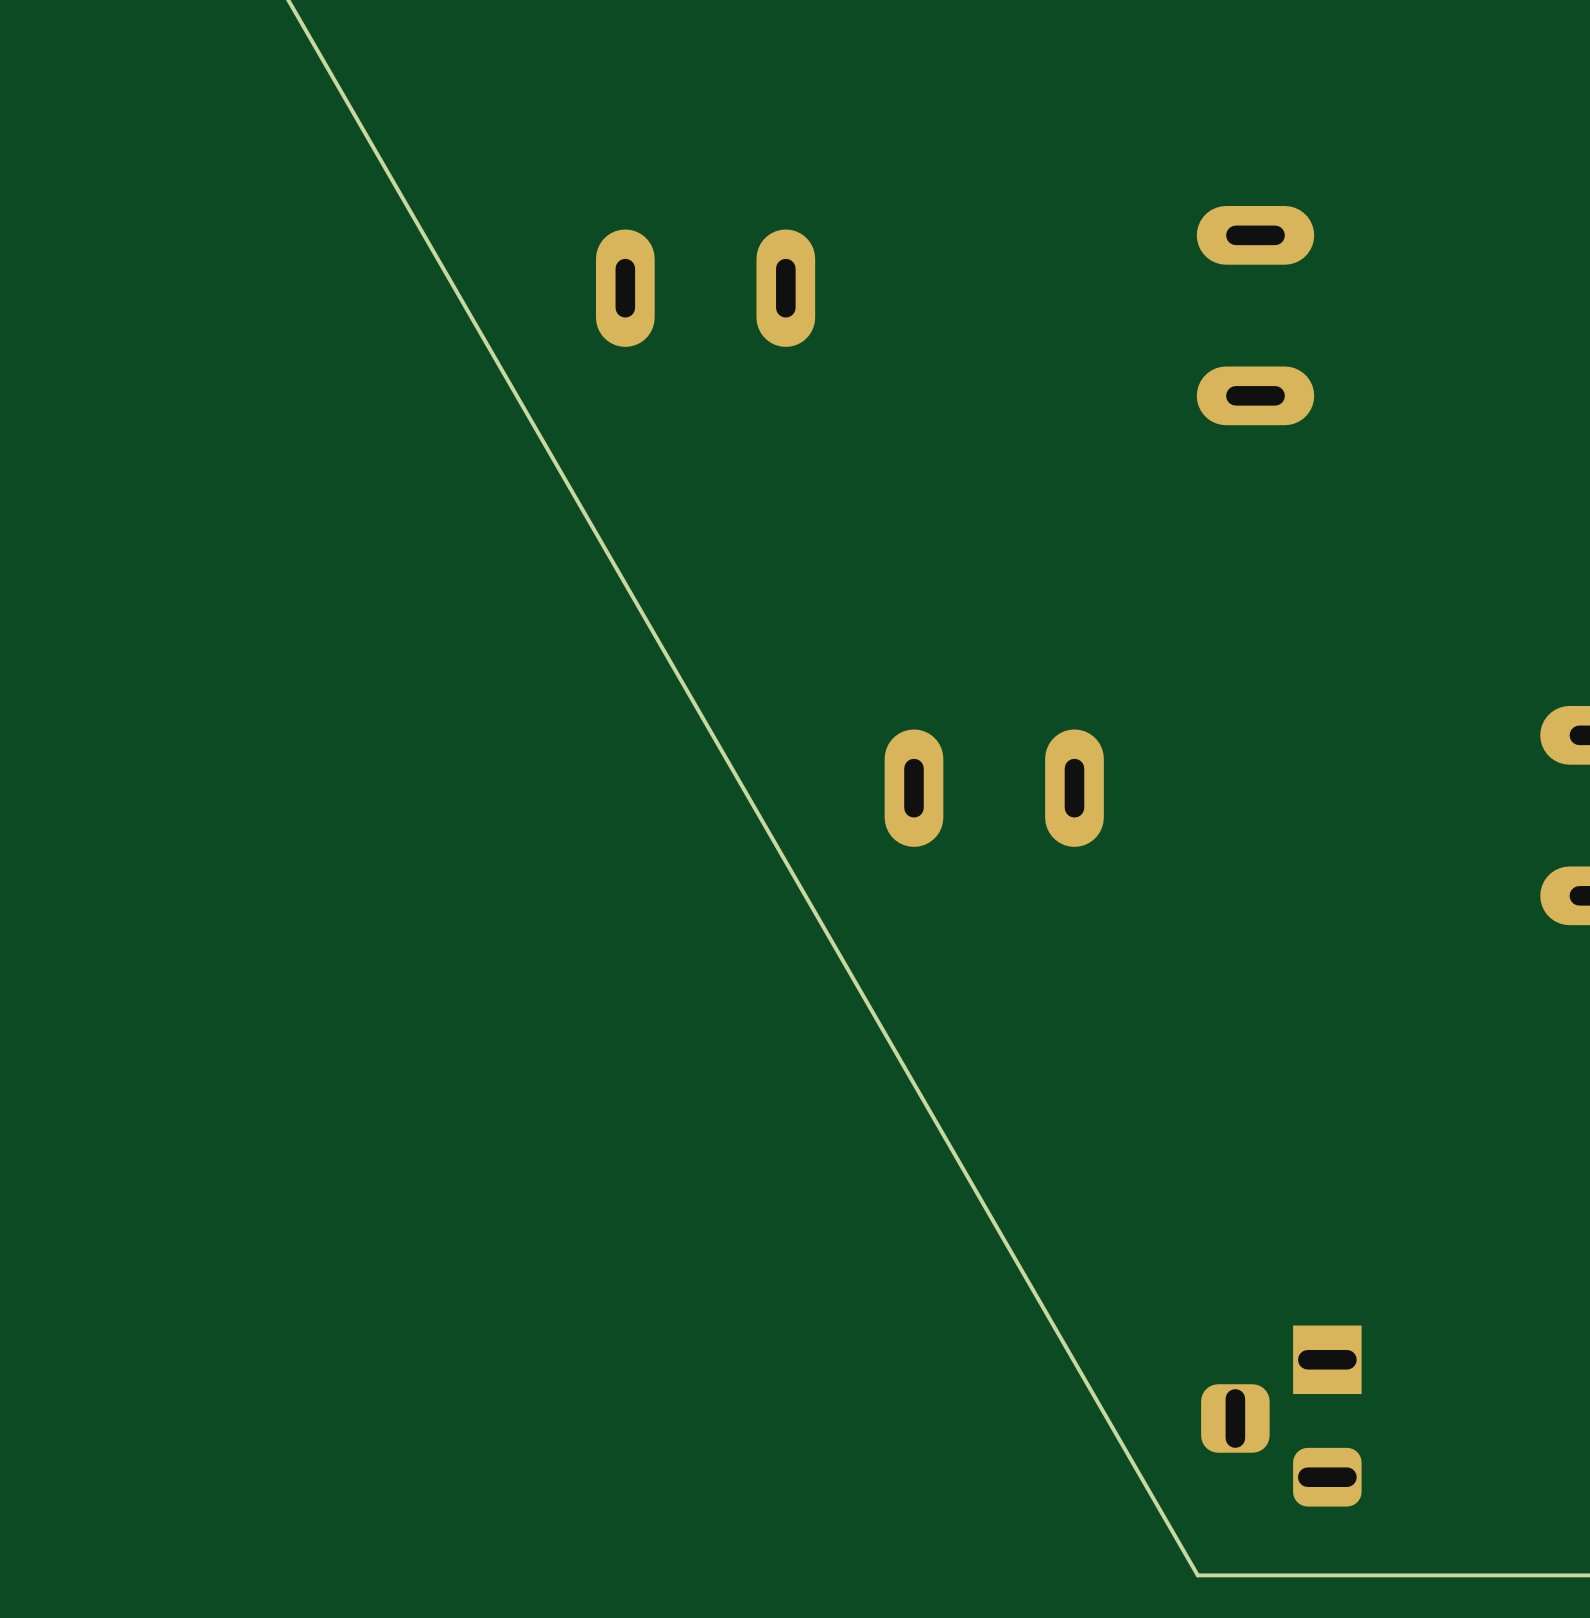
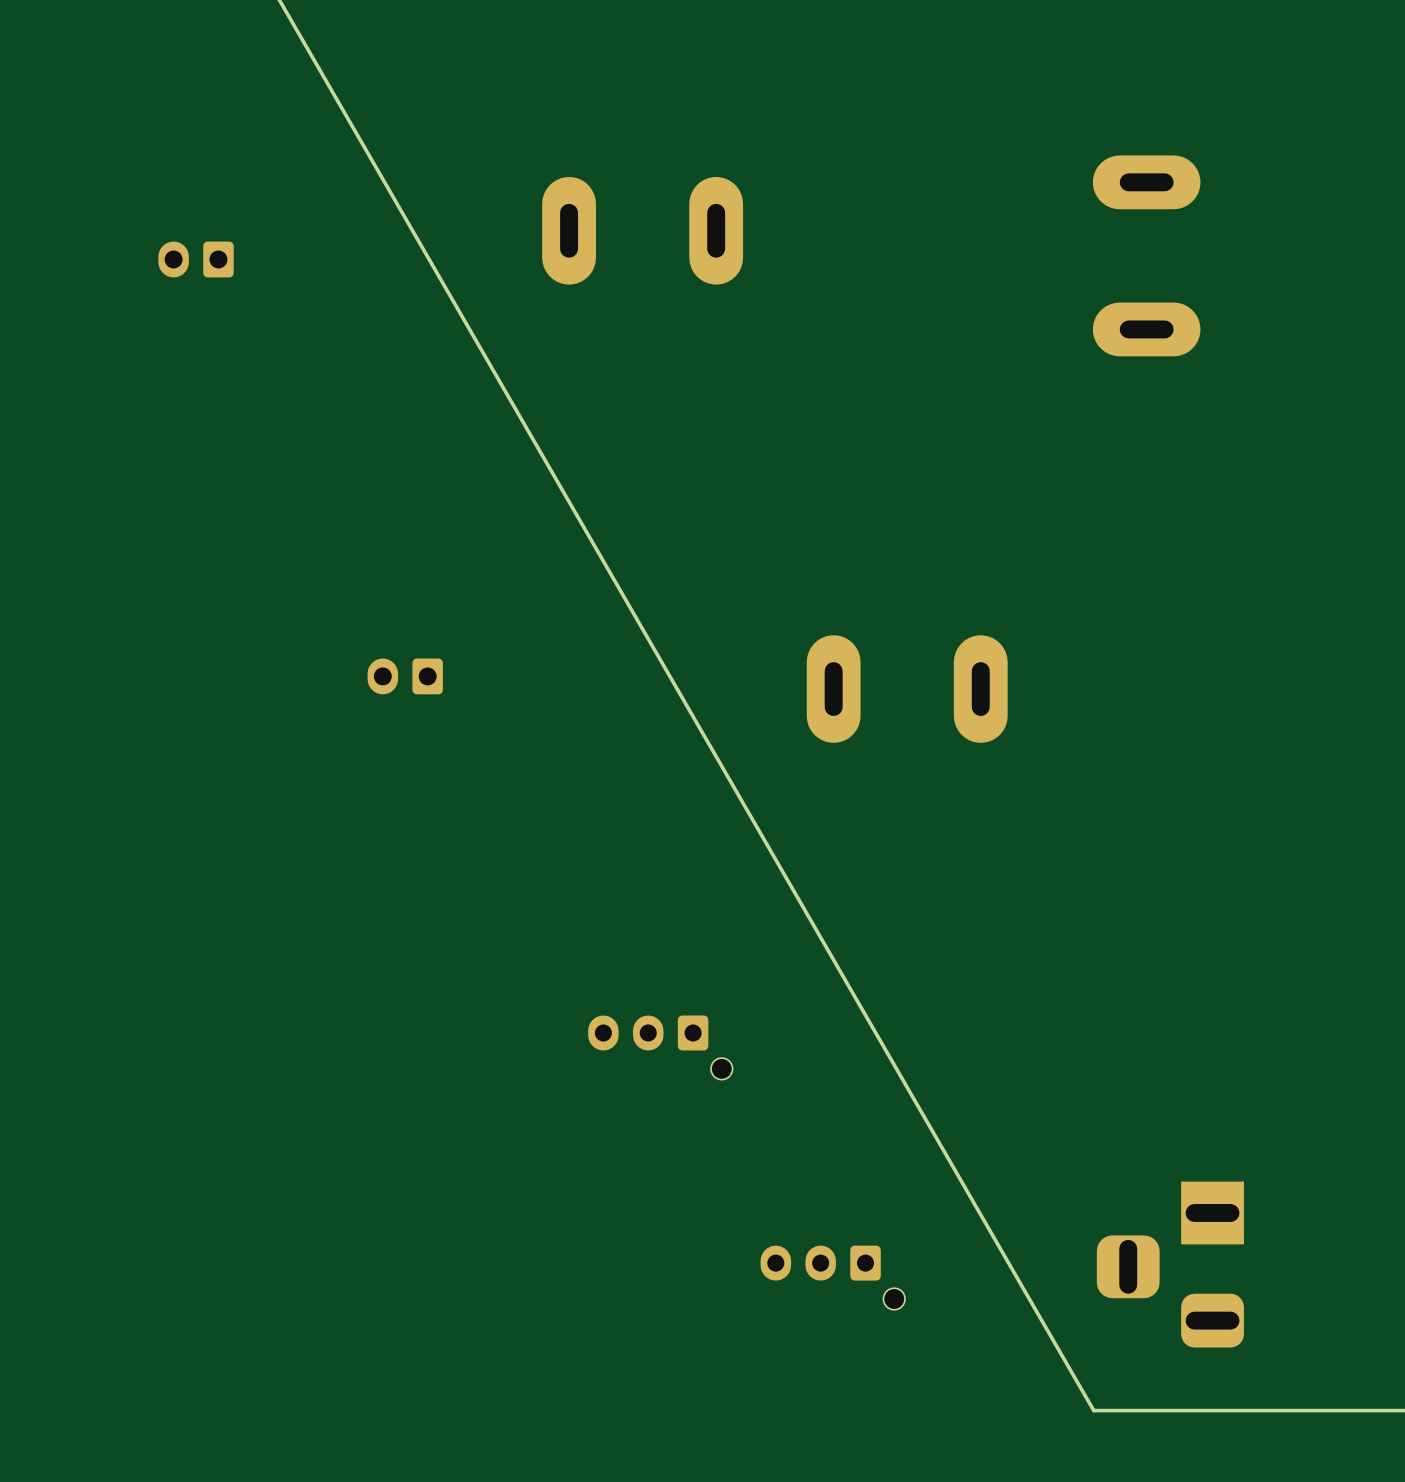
part: none -> (196, 259)
part: none -> (405, 676)
part: none -> (660, 1047)
part: none -> (832, 1277)

